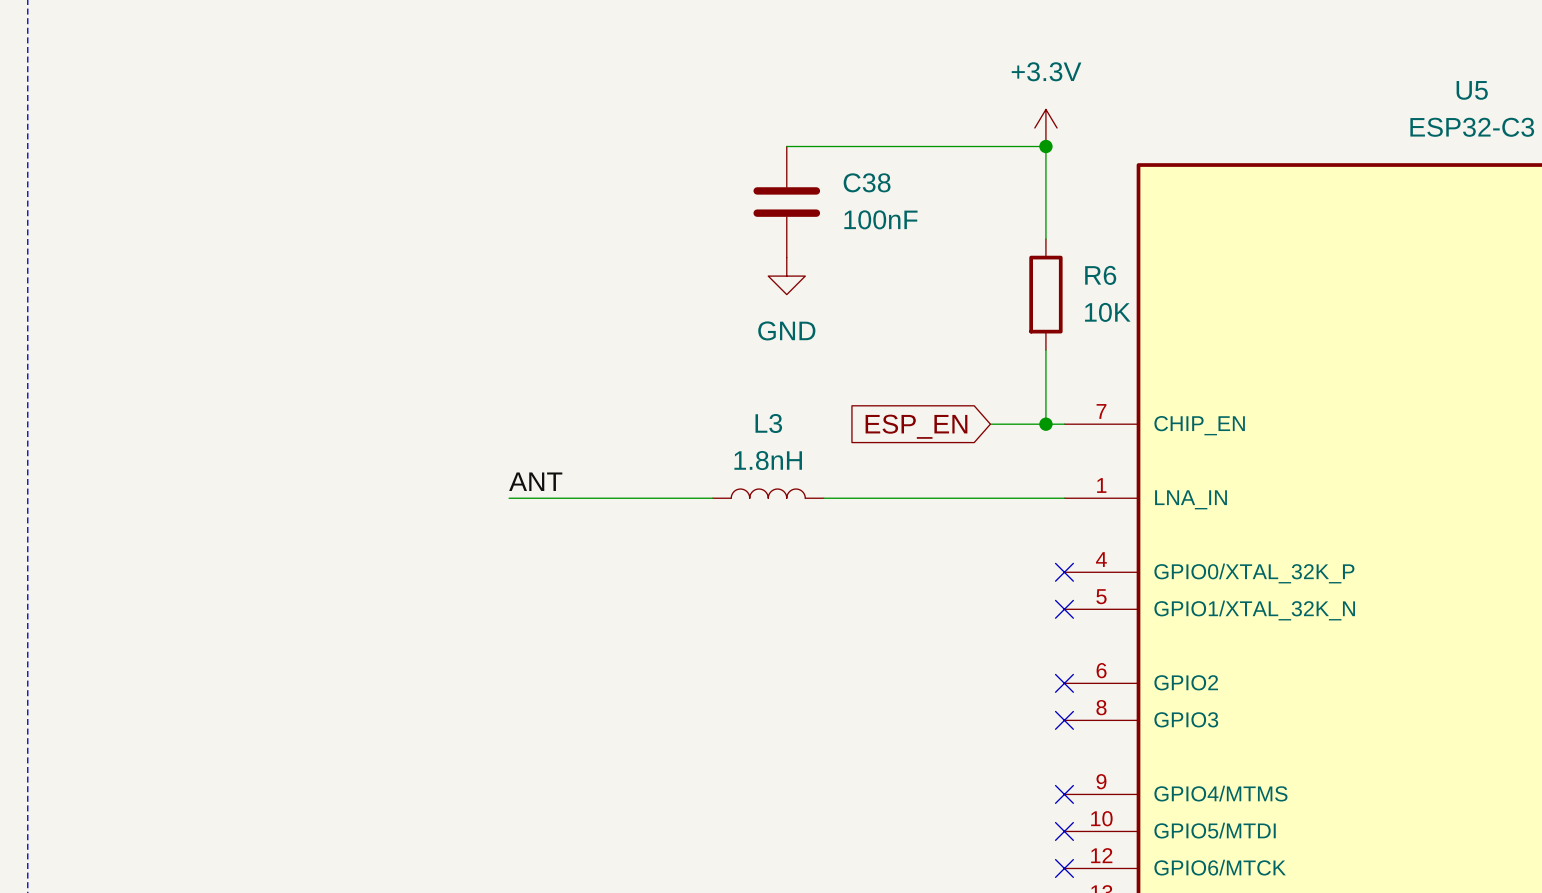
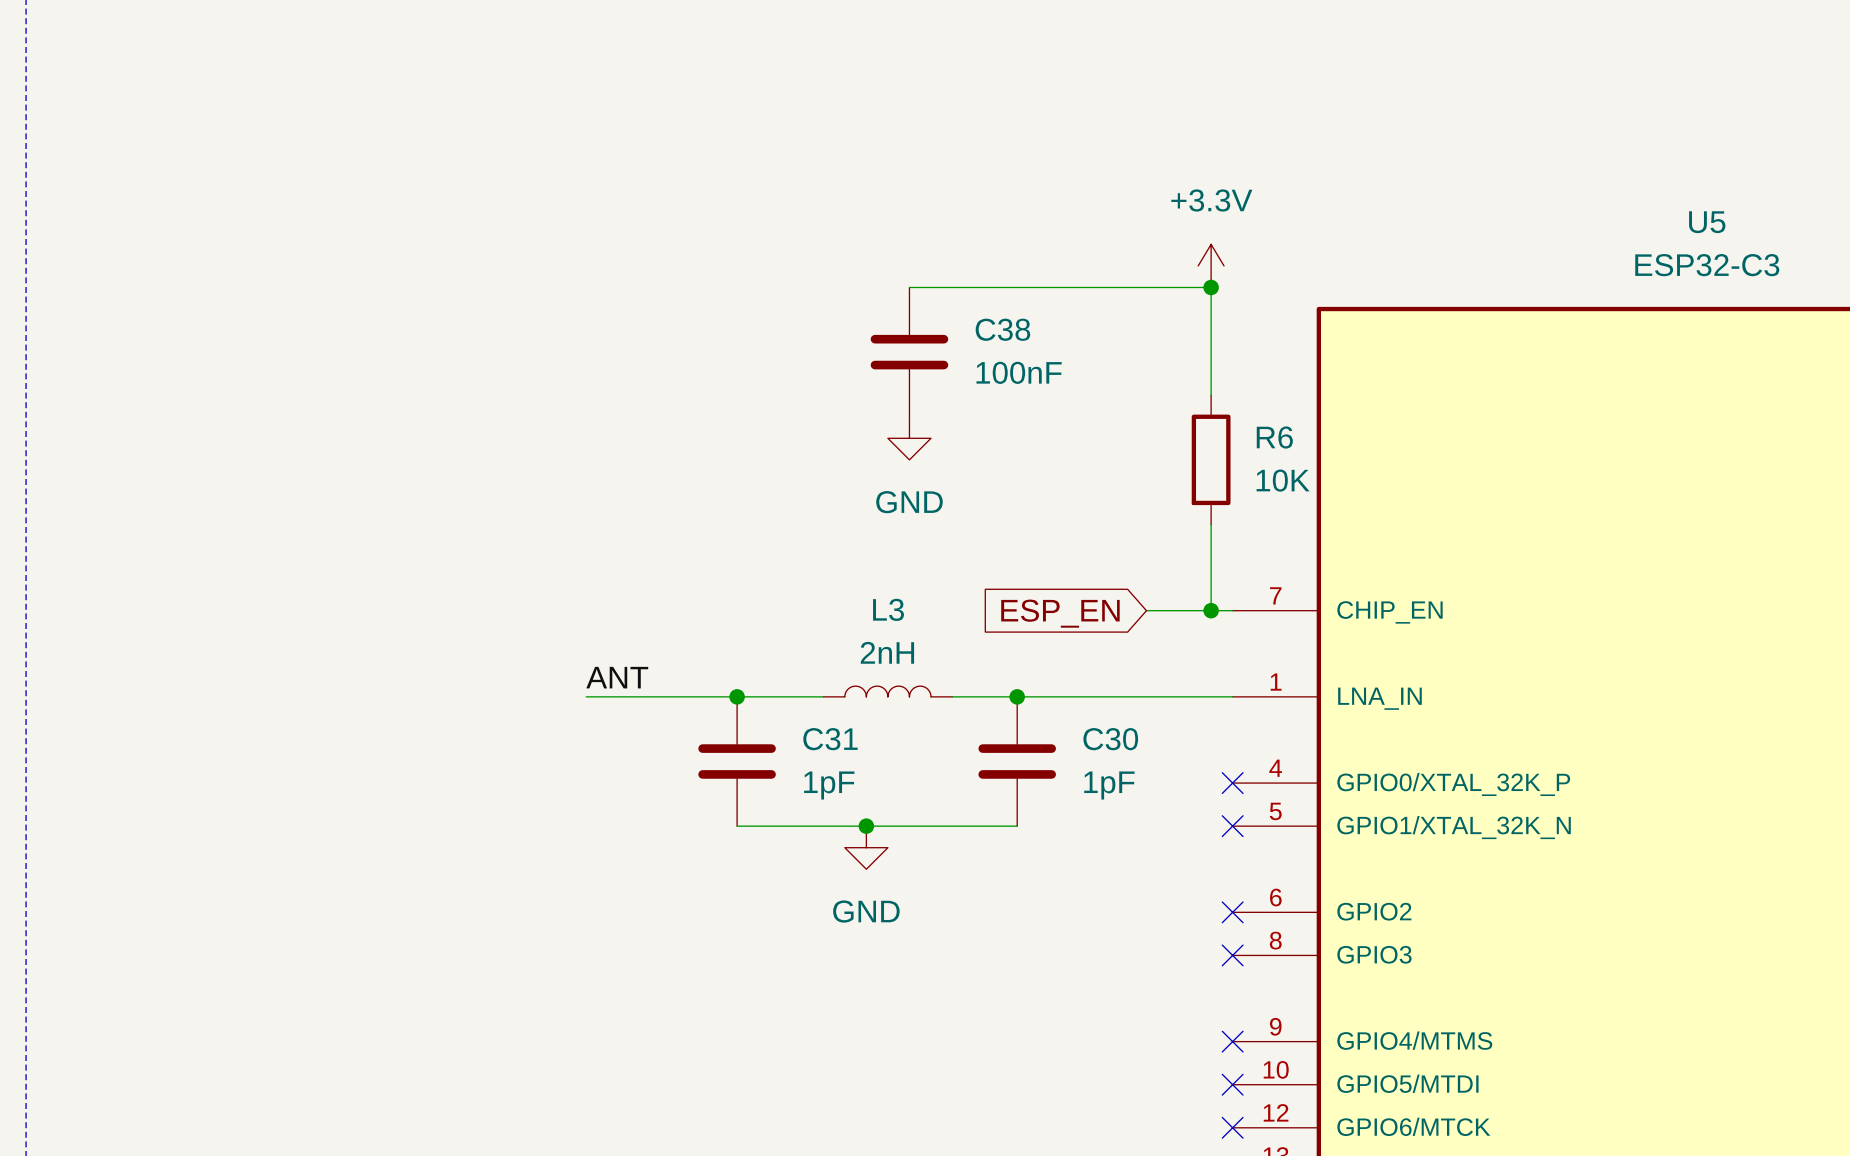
L3 value: 1.8nH (768, 460) -> 2nH (887, 652)
junction: none -> (737, 696)
junction: none -> (1017, 696)
C31: none -> 1pF (737, 761)
C30: none -> 1pF (1017, 761)
wire: none -> (737, 826) (1017, 826)
junction: none -> (866, 826)
power symbol: none -> GND (866, 847)

